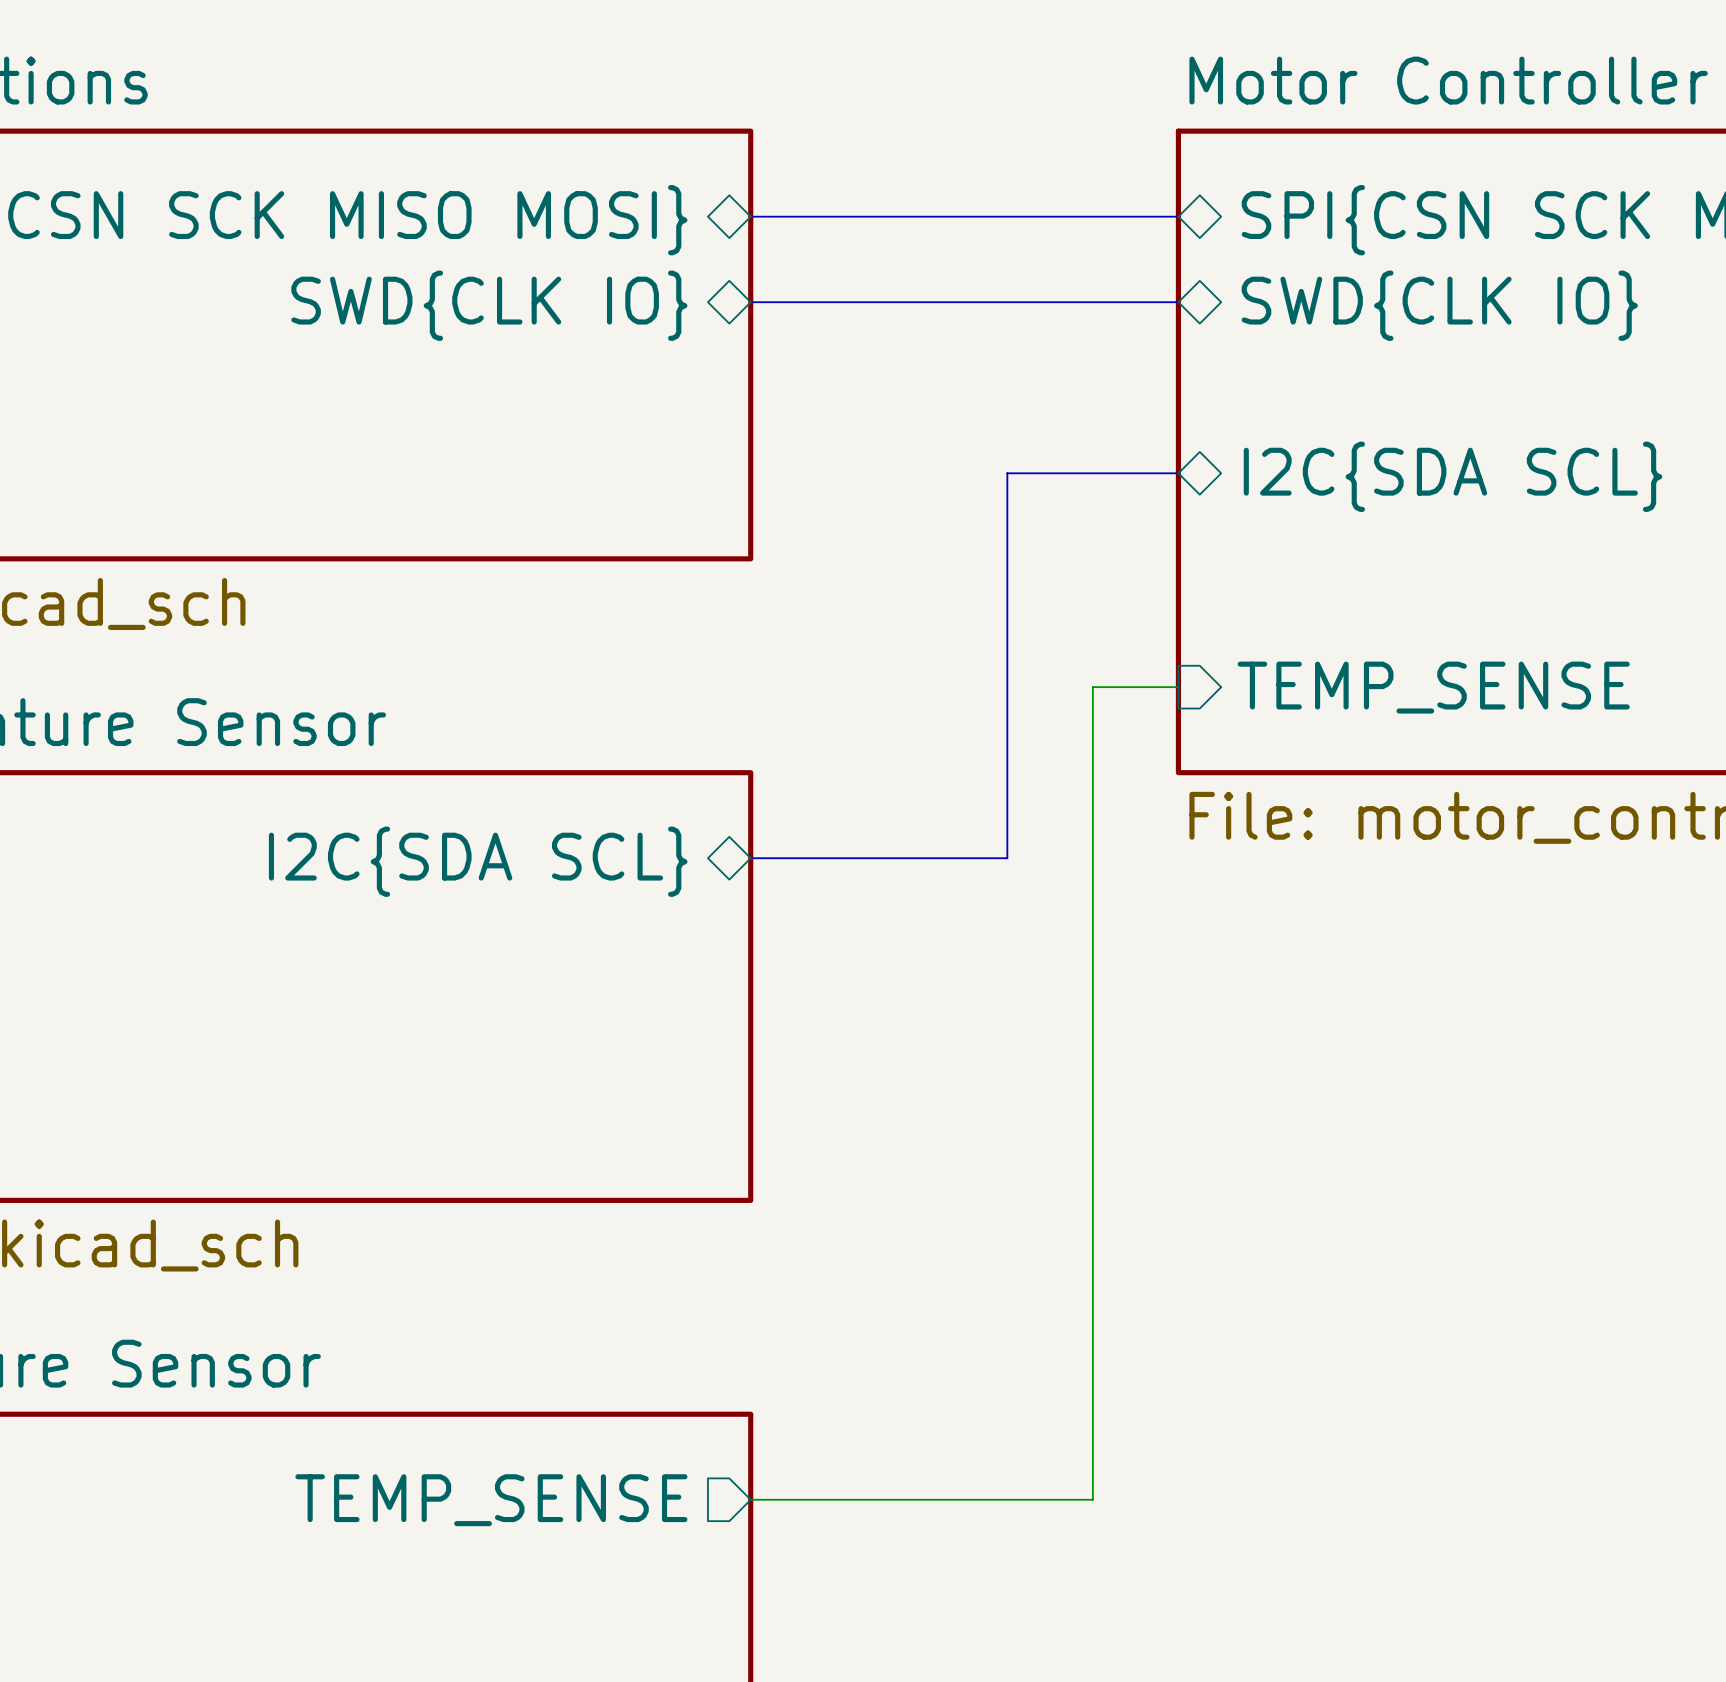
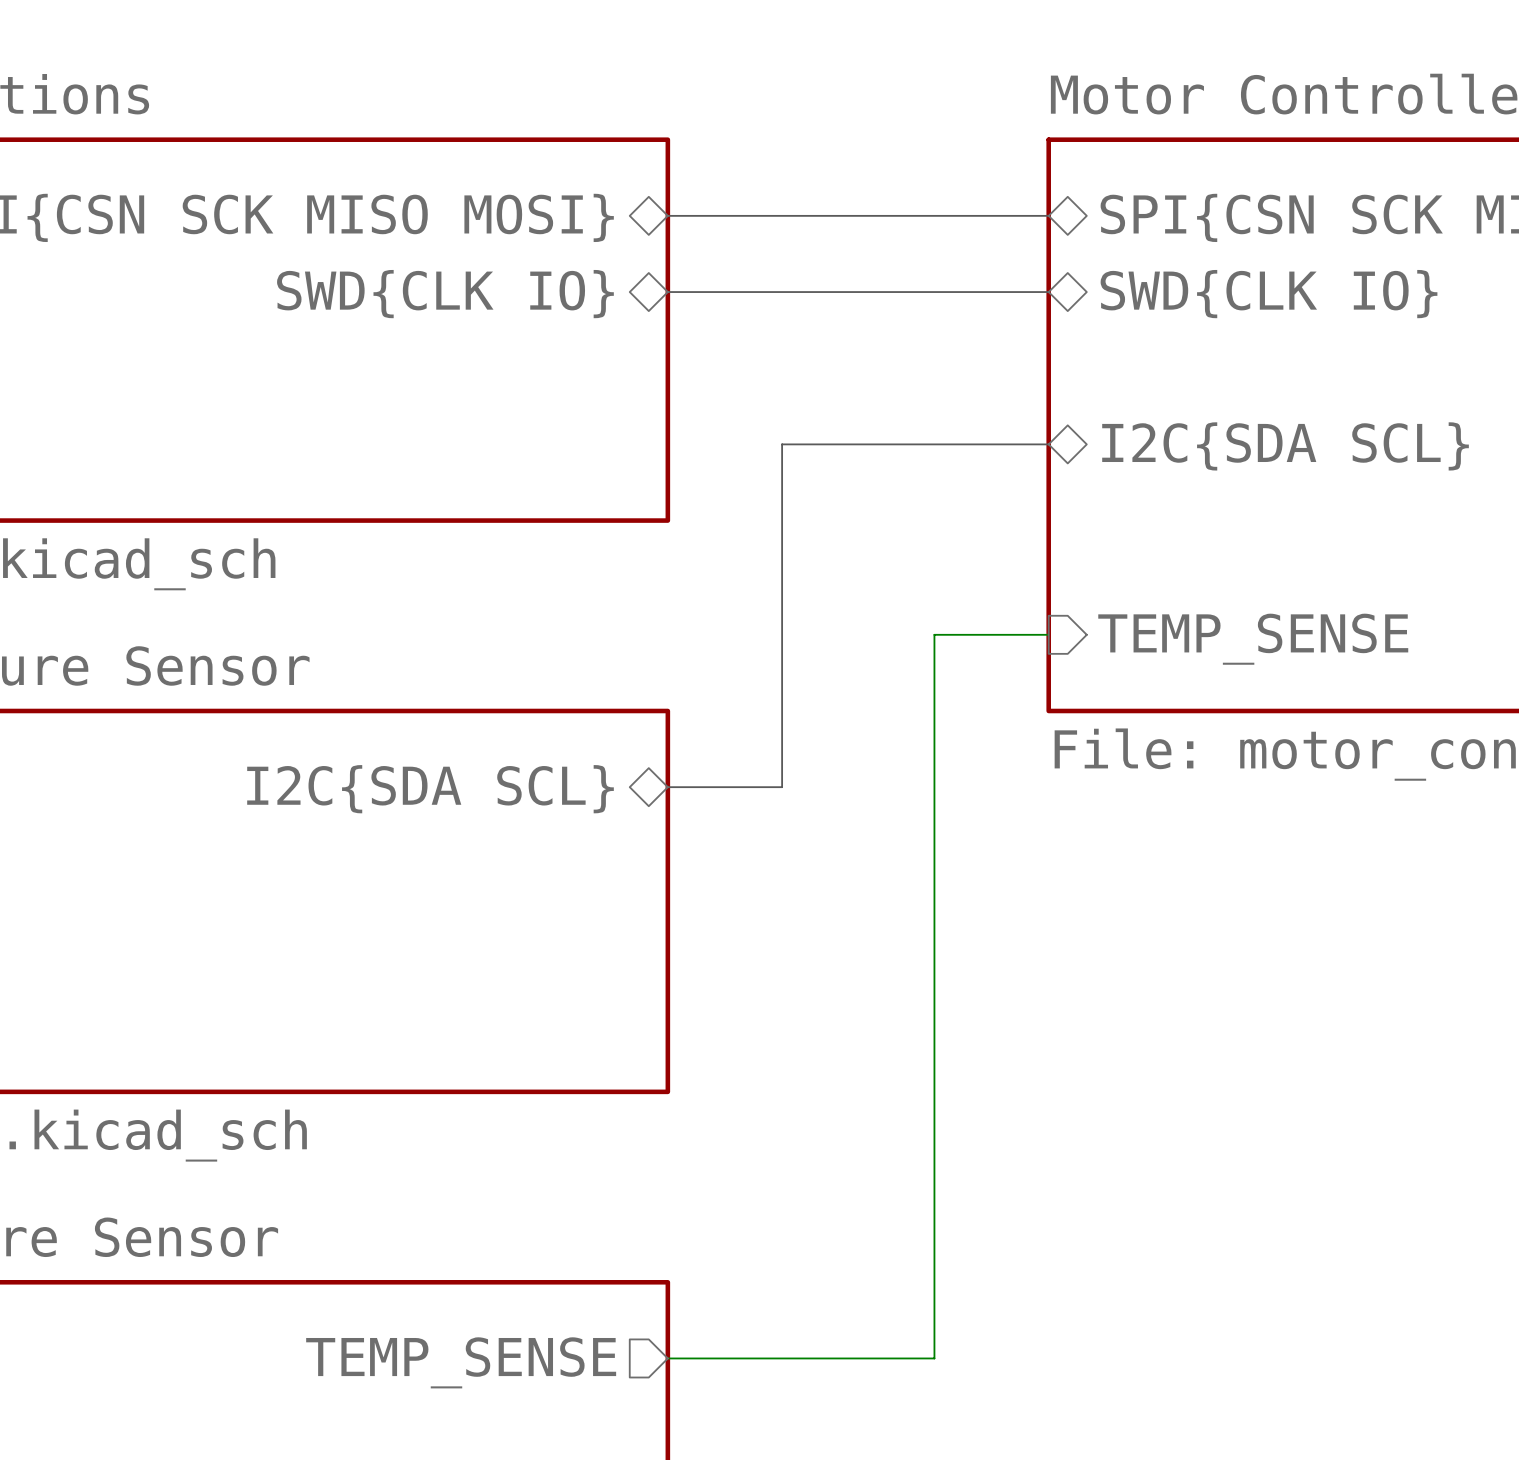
bus: (1007, 473) (1007, 858) (879, 858) -> (896, 444) (782, 444) (782, 787)
wire: (1092, 687) (1092, 1499) (1050, 1499) -> (972, 634) (934, 634) (934, 1358)

